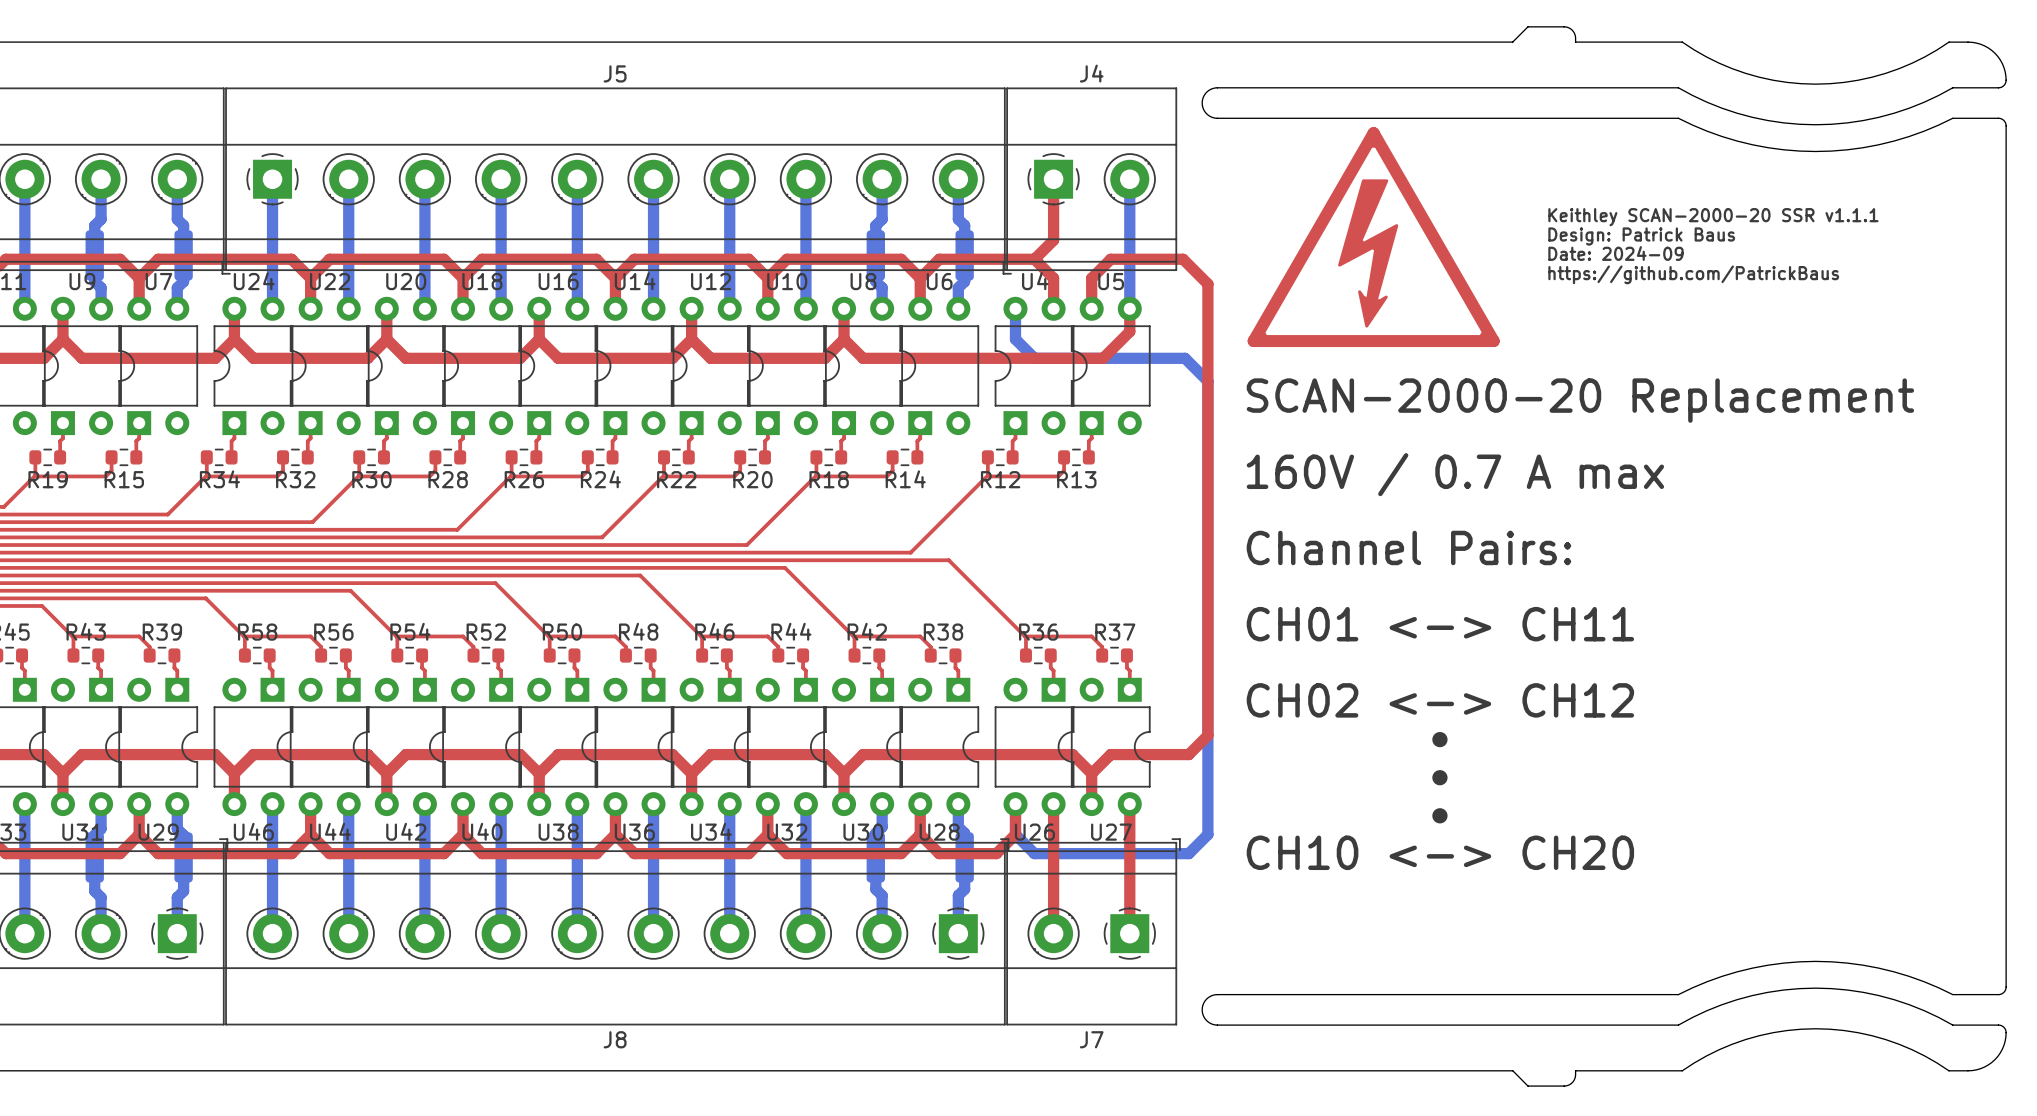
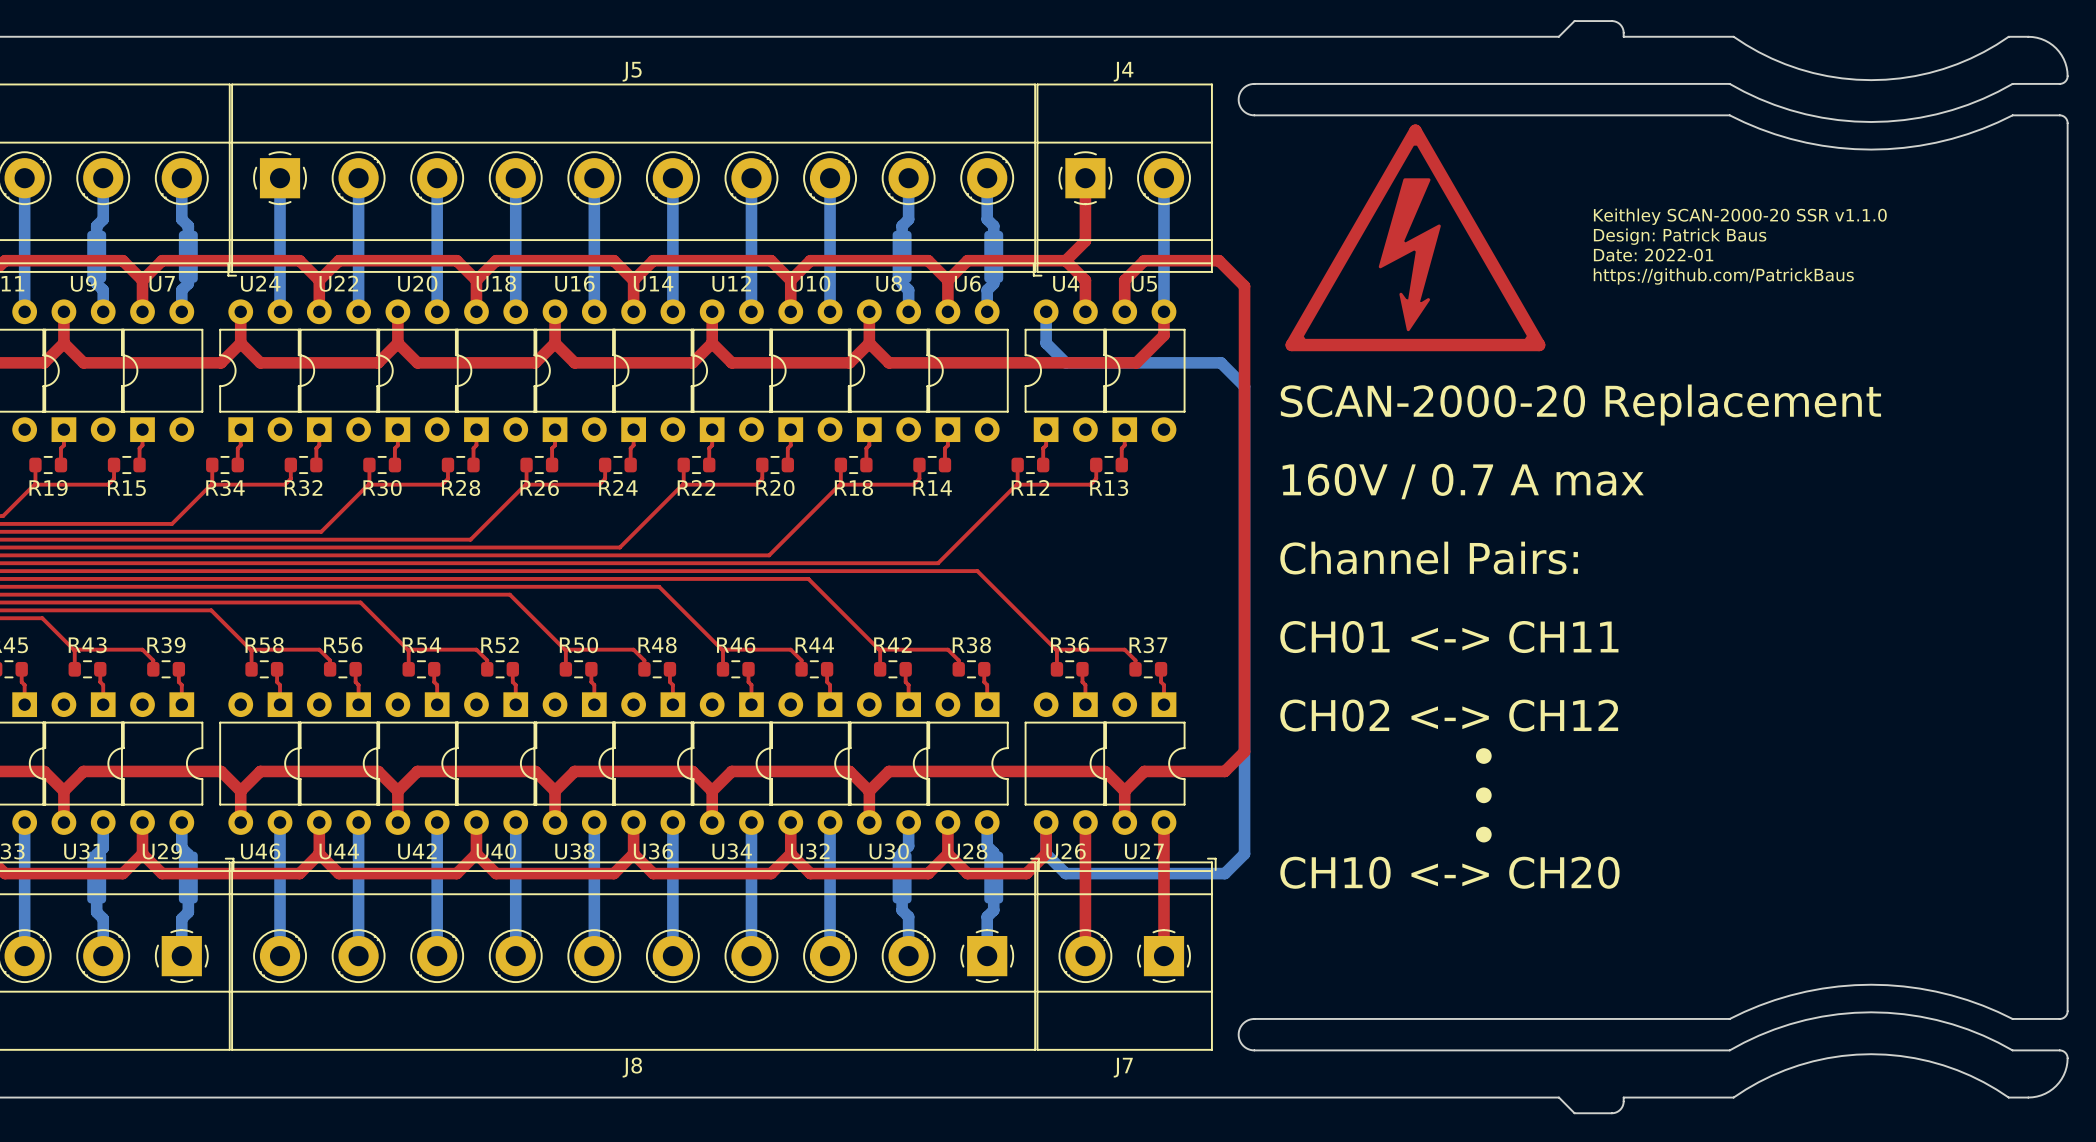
text: Keithley SCAN-2000-20 SSR v1.1.1 (1713, 217) -> Keithley SCAN-2000-20 SSR v1.1.0 (1740, 216)
text: Date: 2024-09 (1616, 253) -> Date: 2022-01 (1653, 255)

